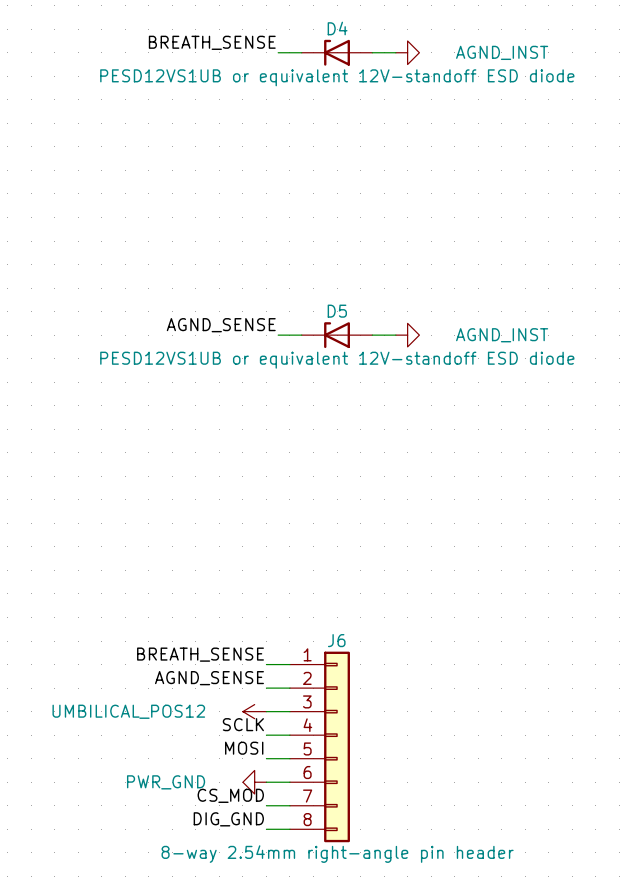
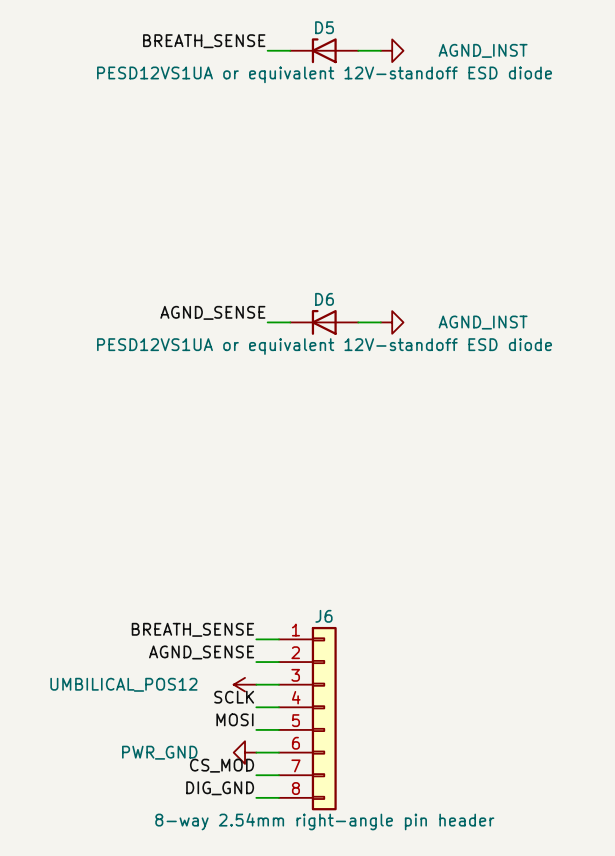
D4 name: D4 (337, 28) -> D5 (324, 27)
D4 value: PESD12VS1UB or equivalent 12V-standoff ESD diode (337, 77) -> PESD12VS1UA or equivalent 12V-standoff ESD diode (324, 74)
D5 name: D5 (337, 311) -> D6 (324, 299)
D5 value: PESD12VS1UB or equivalent 12V-standoff ESD diode (337, 360) -> PESD12VS1UA or equivalent 12V-standoff ESD diode (324, 346)

